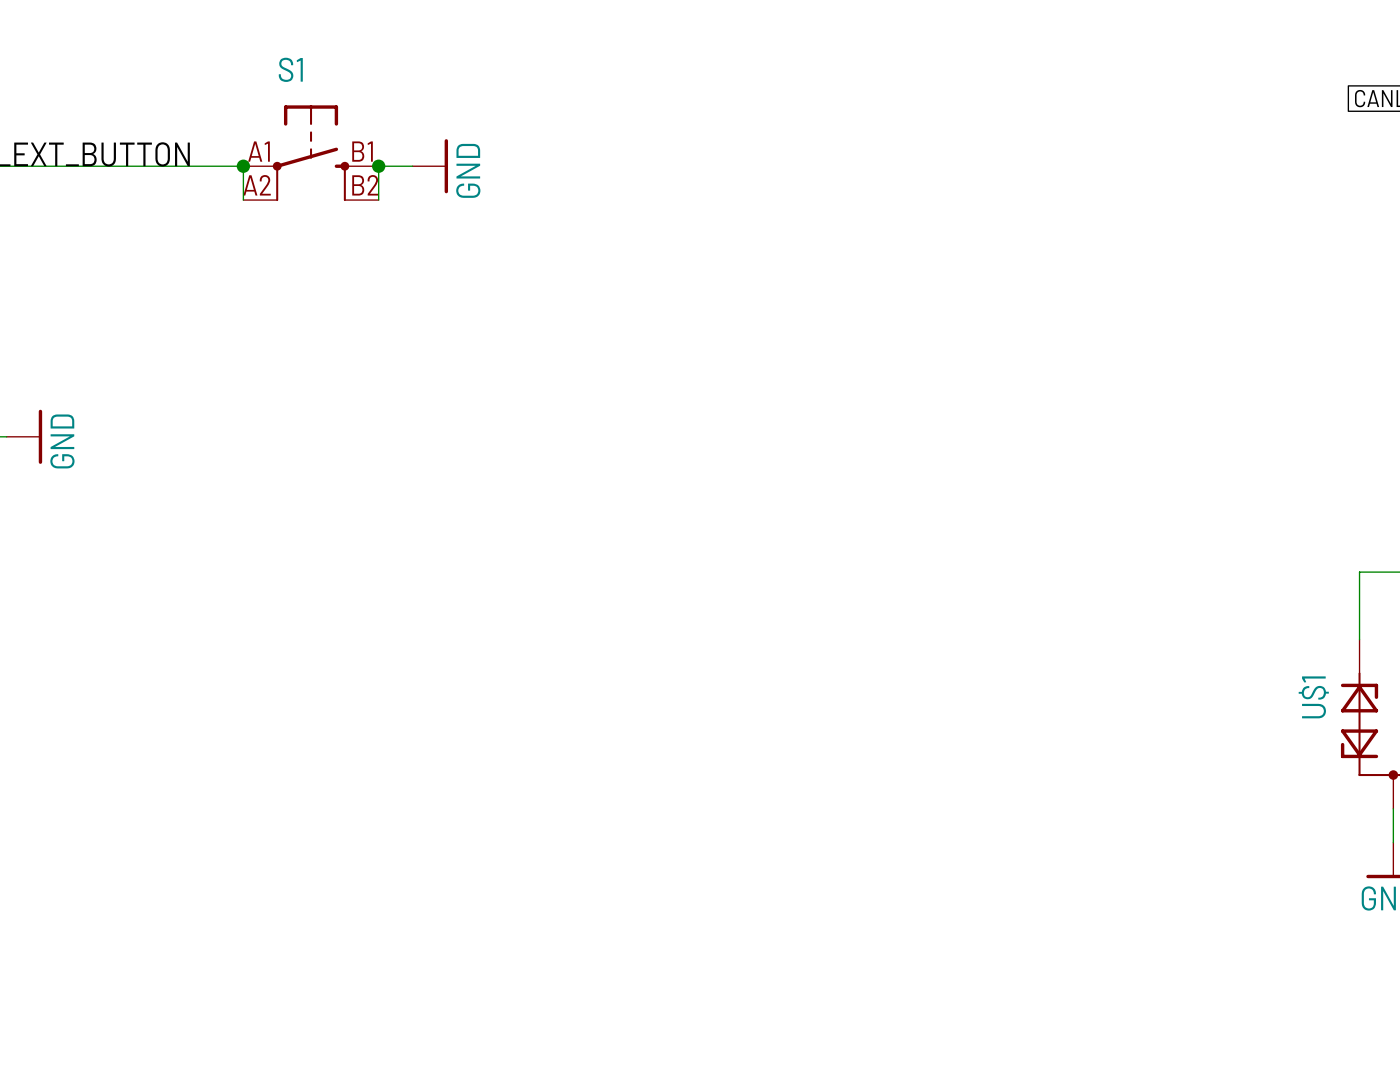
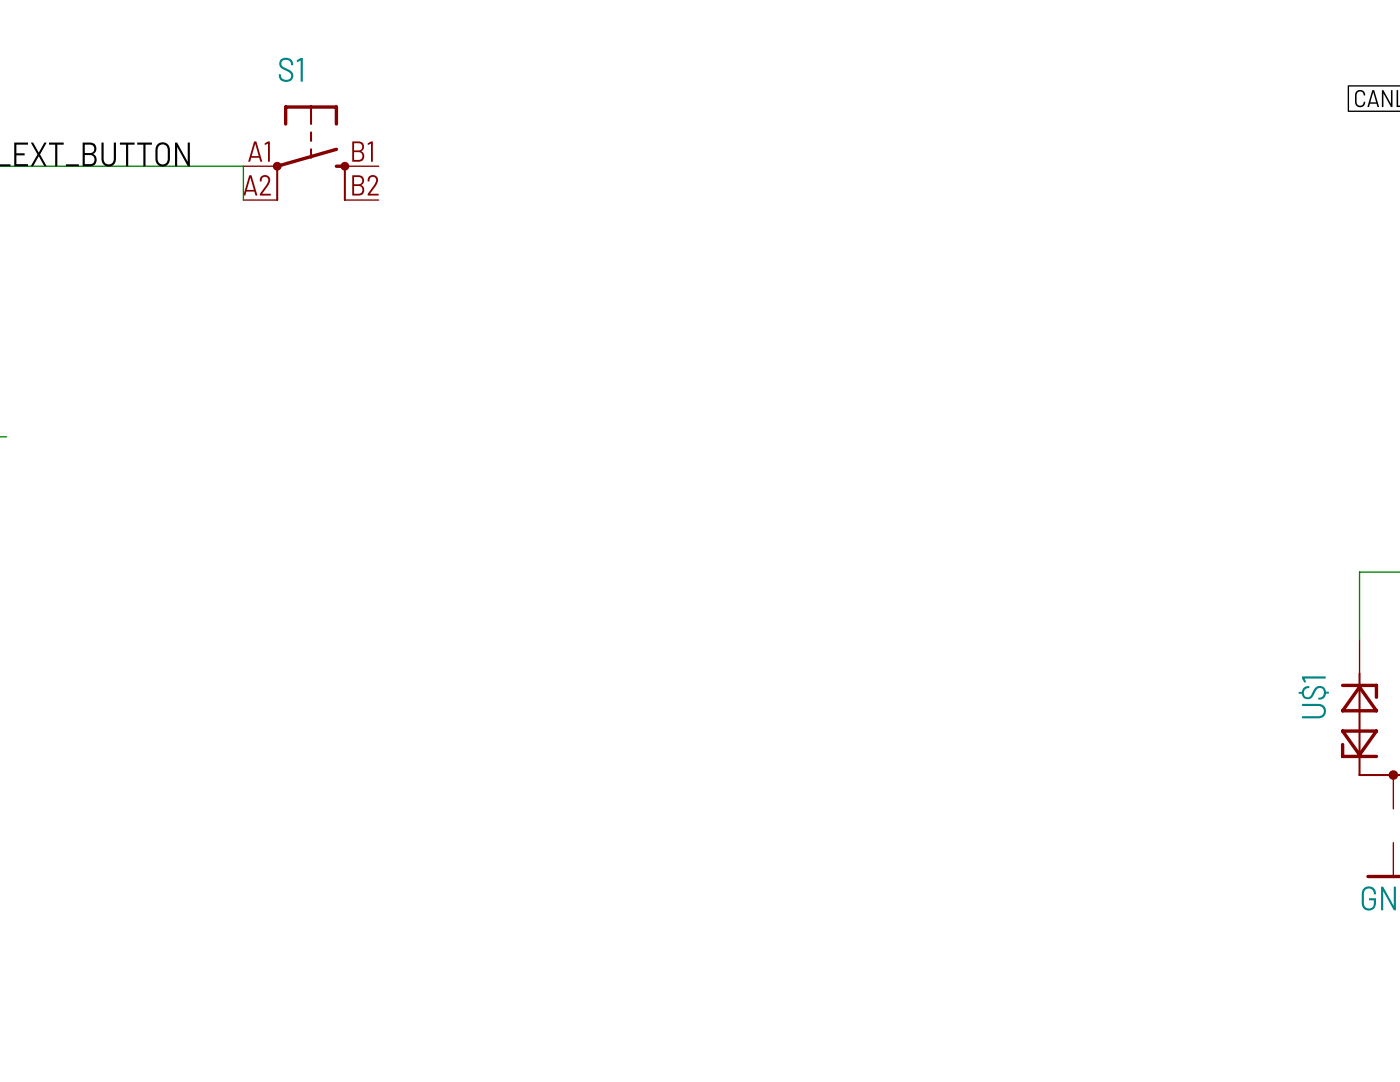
junction: (243, 166) -> none
junction: (378, 166) -> none
wire: (412, 166) (378, 166) (378, 200) -> none
power symbol: GND (430, 166) -> none
power symbol: GND (24, 436) -> none
wire: (1393, 808) (1393, 842) -> none

